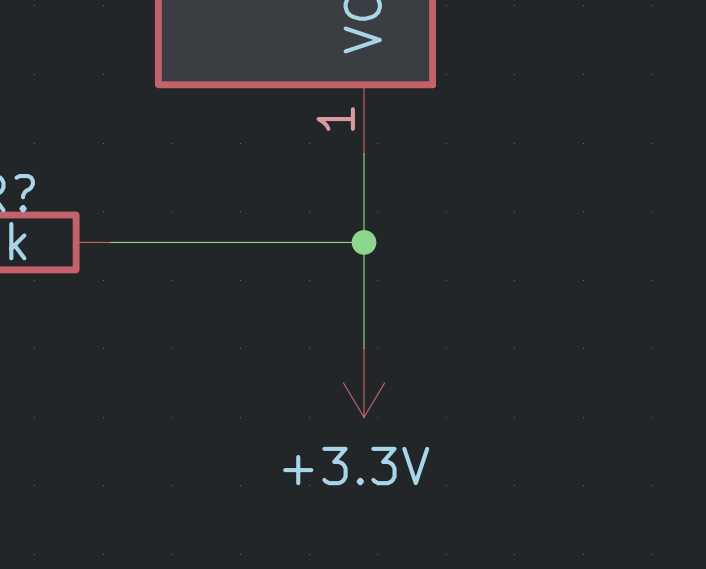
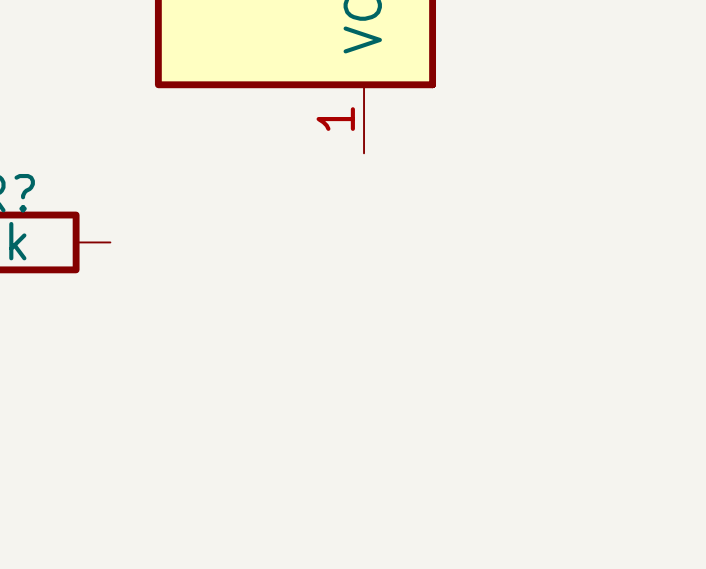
wire: (364, 153) (364, 348) -> none
wire: (110, 242) (364, 242) -> none
junction: (364, 242) -> none
power symbol: +3.3V (364, 382) -> none

